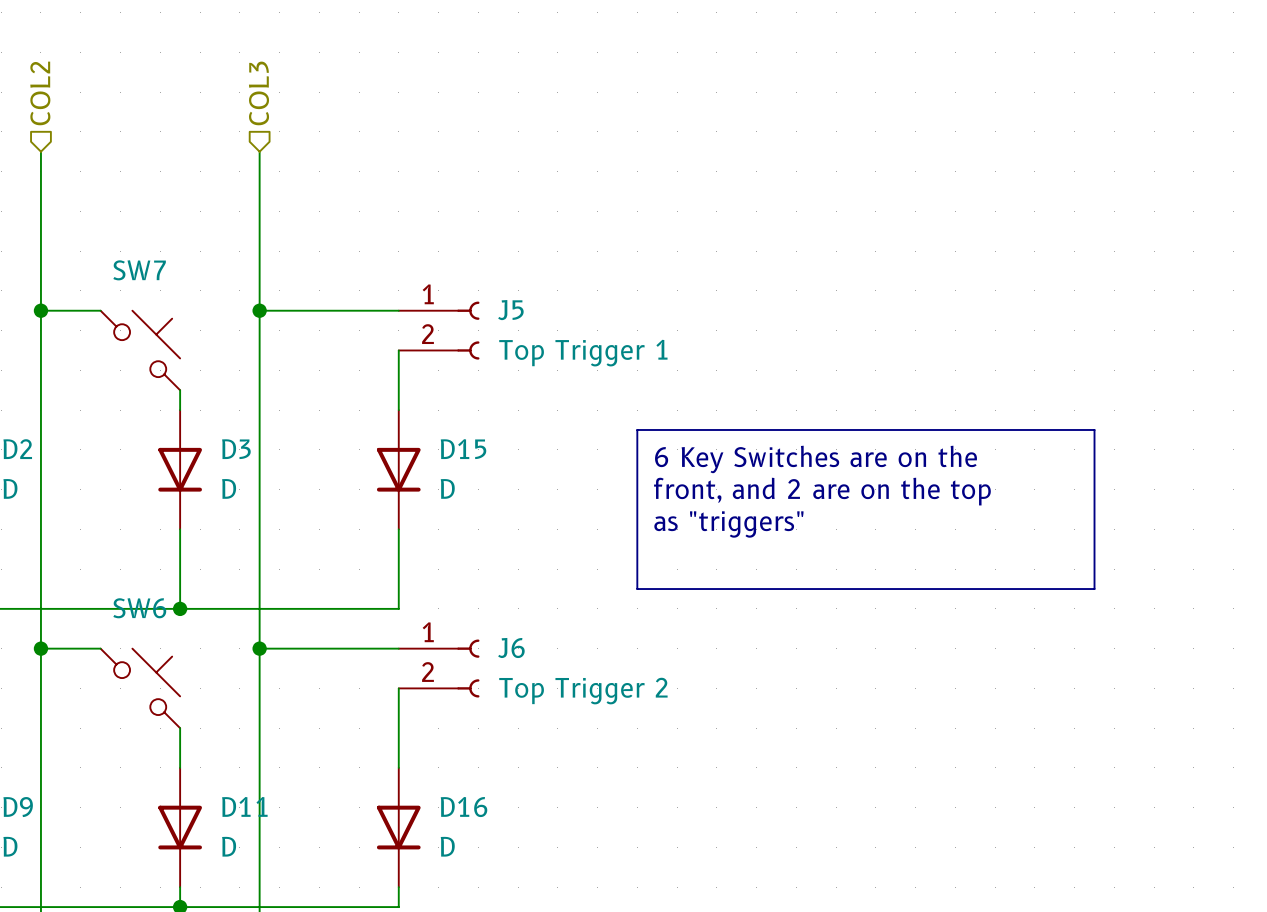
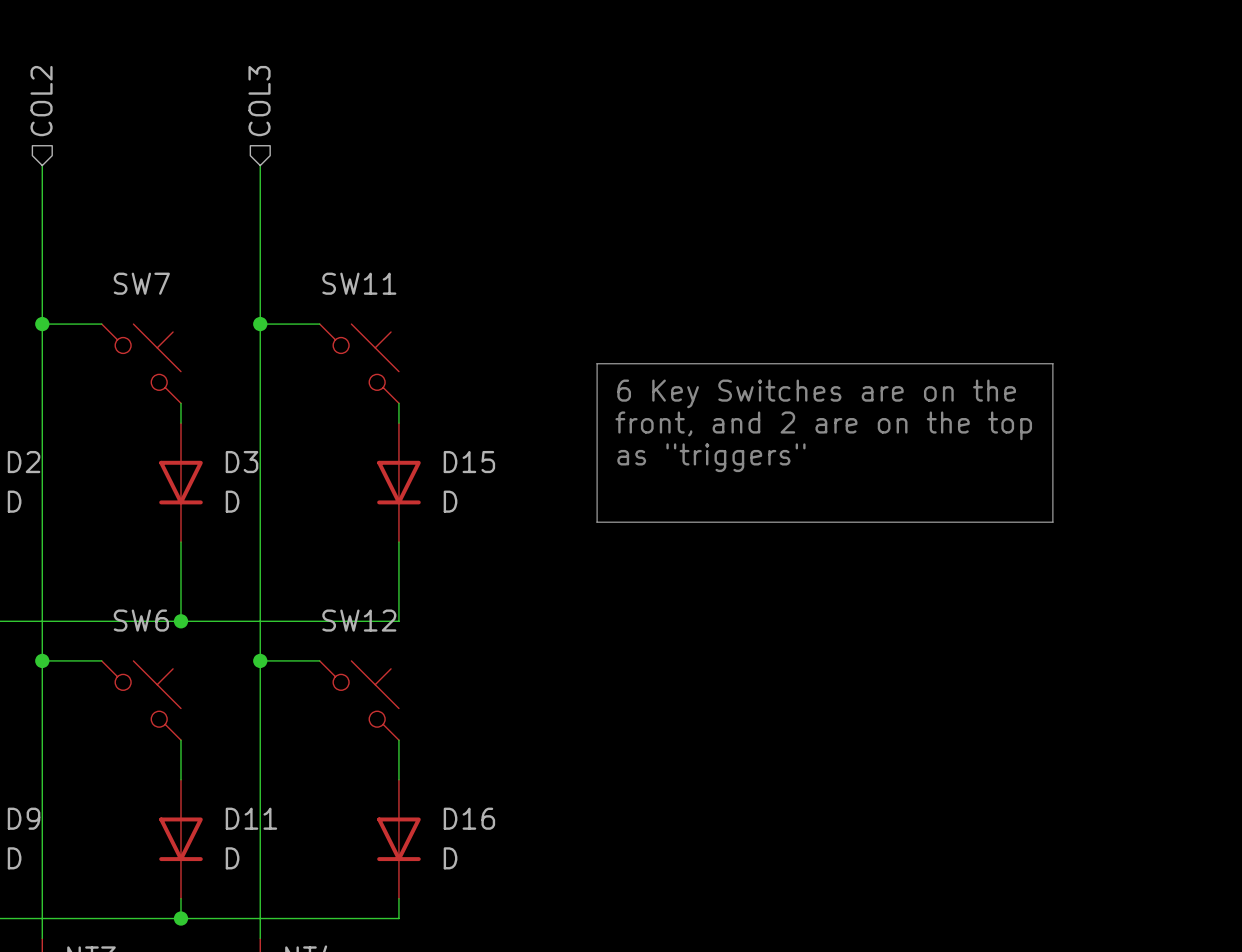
wire: (319, 310) (398, 310) -> none
J5: Top Trigger 1 (439, 330) -> none
SW11: none -> (359, 363)
wire: (398, 350) (398, 390) -> none
line: (637, 429) (1094, 429) (1094, 589) (637, 589) (637, 429) -> (597, 363) (1052, 363) (1052, 522) (597, 522) (597, 363)
text position: 6 Key Switches are on the (815, 459) -> 6 Key Switches are on the (816, 393)
text position: front, and 2 are on the top (822, 491) -> front, and 2 are on the top (823, 425)
text position: as "triggers" (728, 524) -> as "triggers" (711, 457)
wire: (319, 648) (398, 648) -> none
J6: Top Trigger 2 (439, 668) -> none
SW12: none -> (359, 700)
wire: (398, 688) (398, 728) -> none

